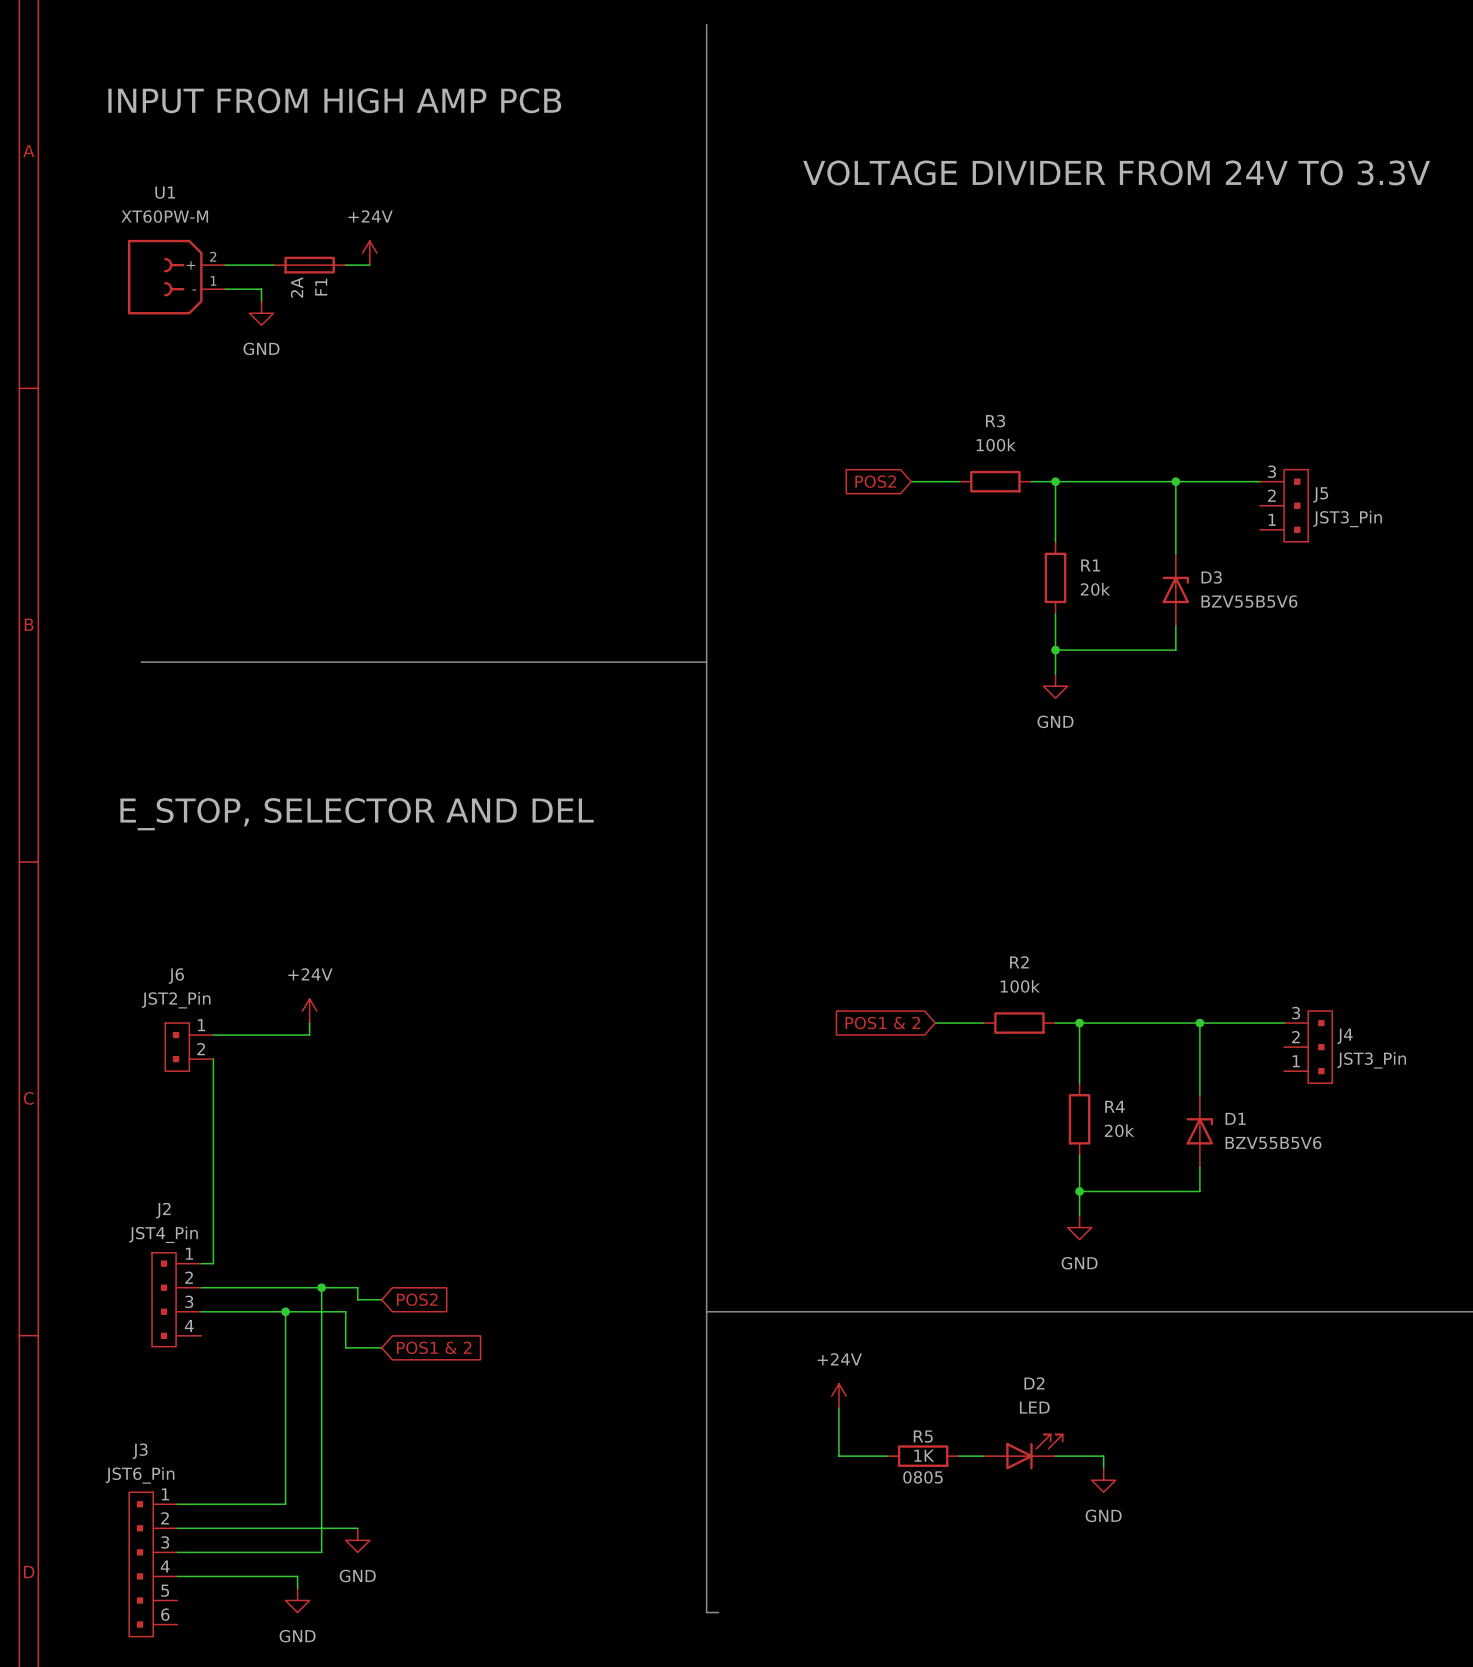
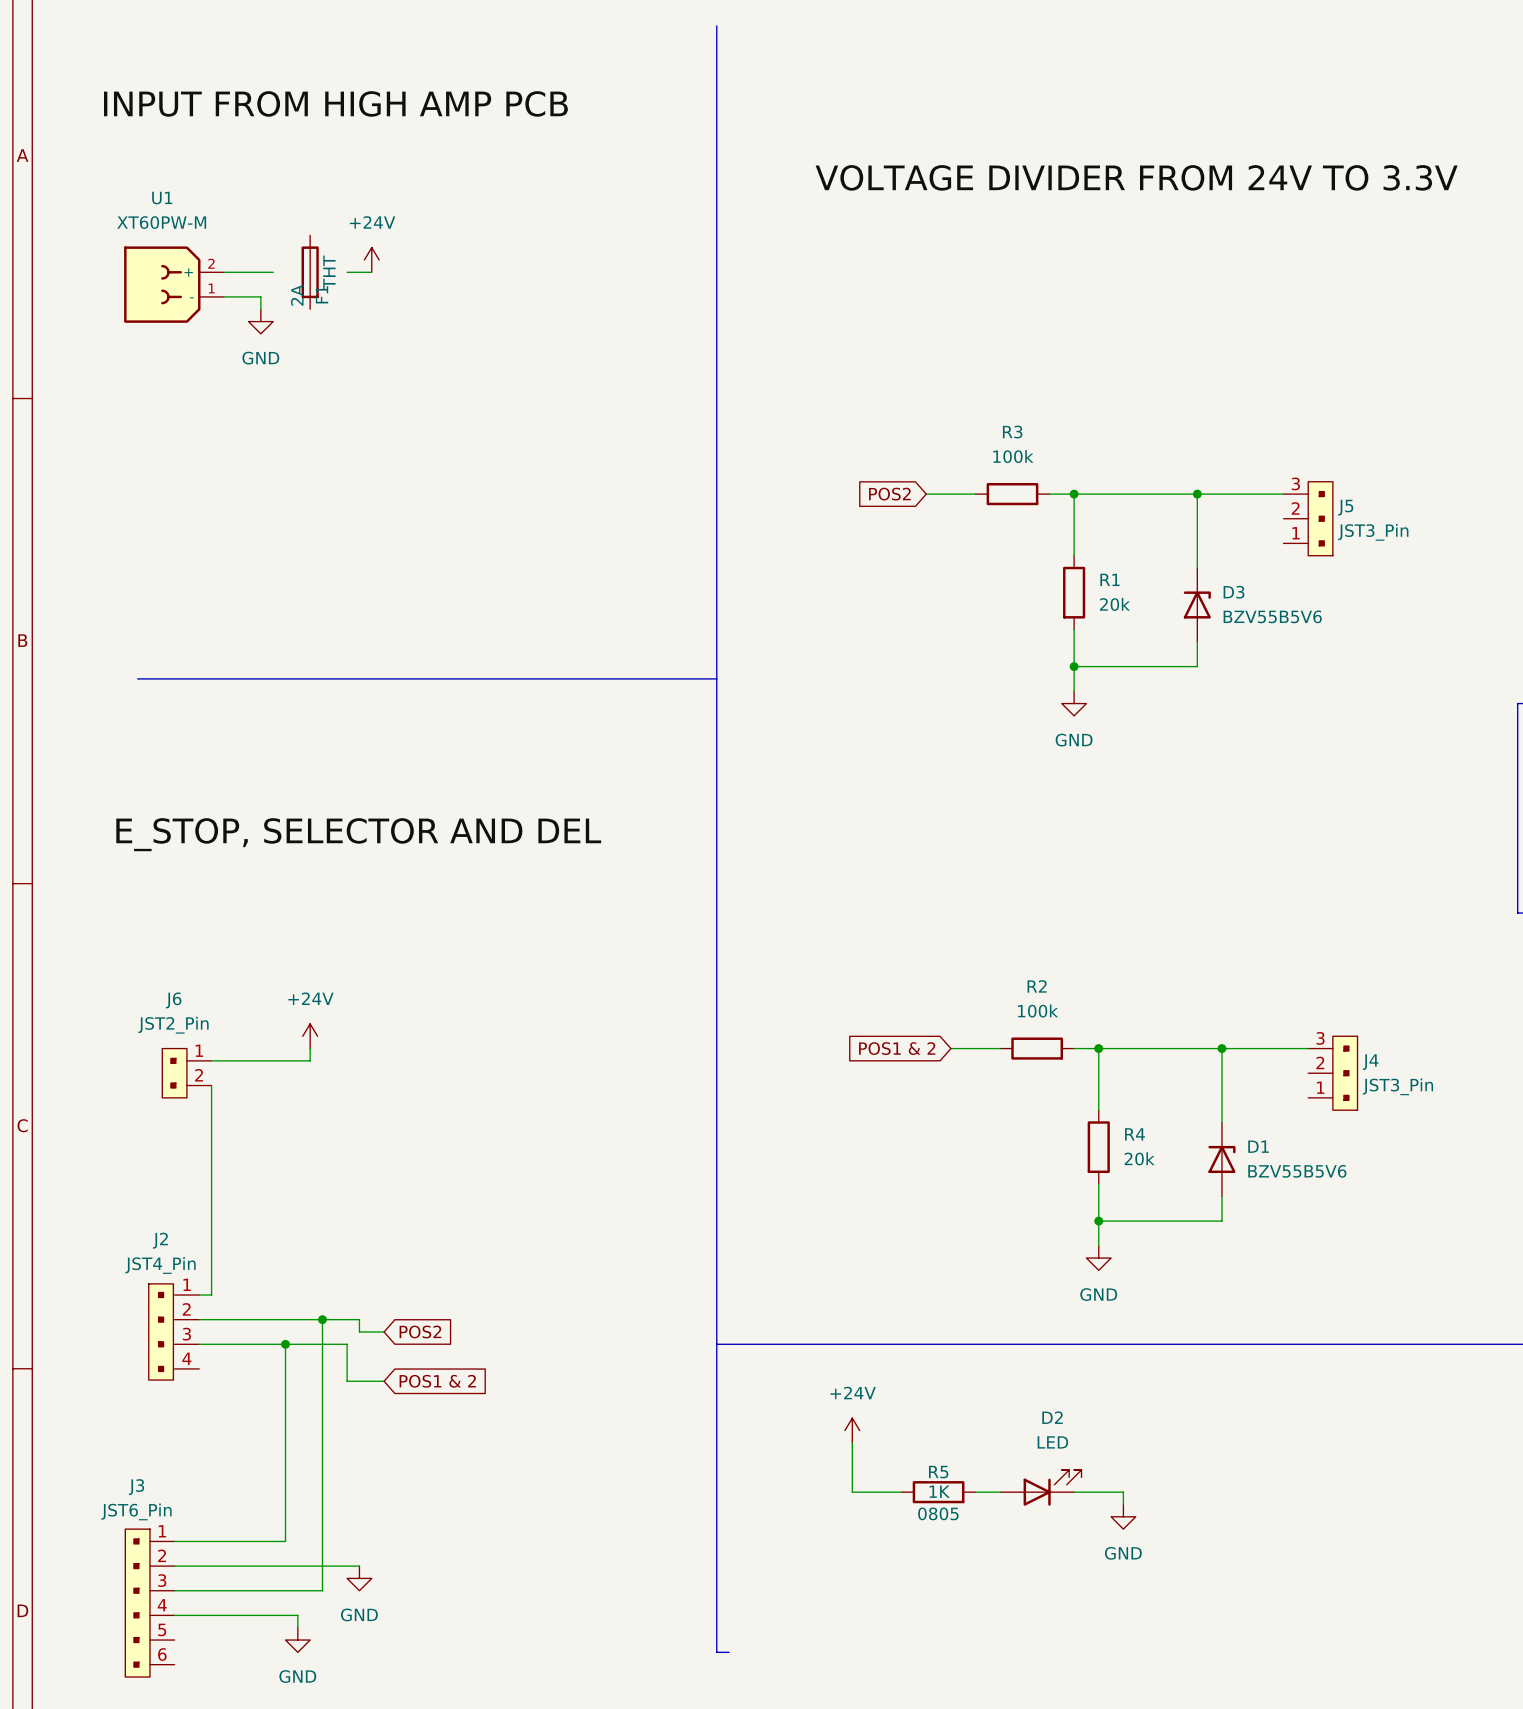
F1 rotation: 0° (309, 265) -> 90° clockwise (310, 272)
F1 text: none -> THT (329, 272)

